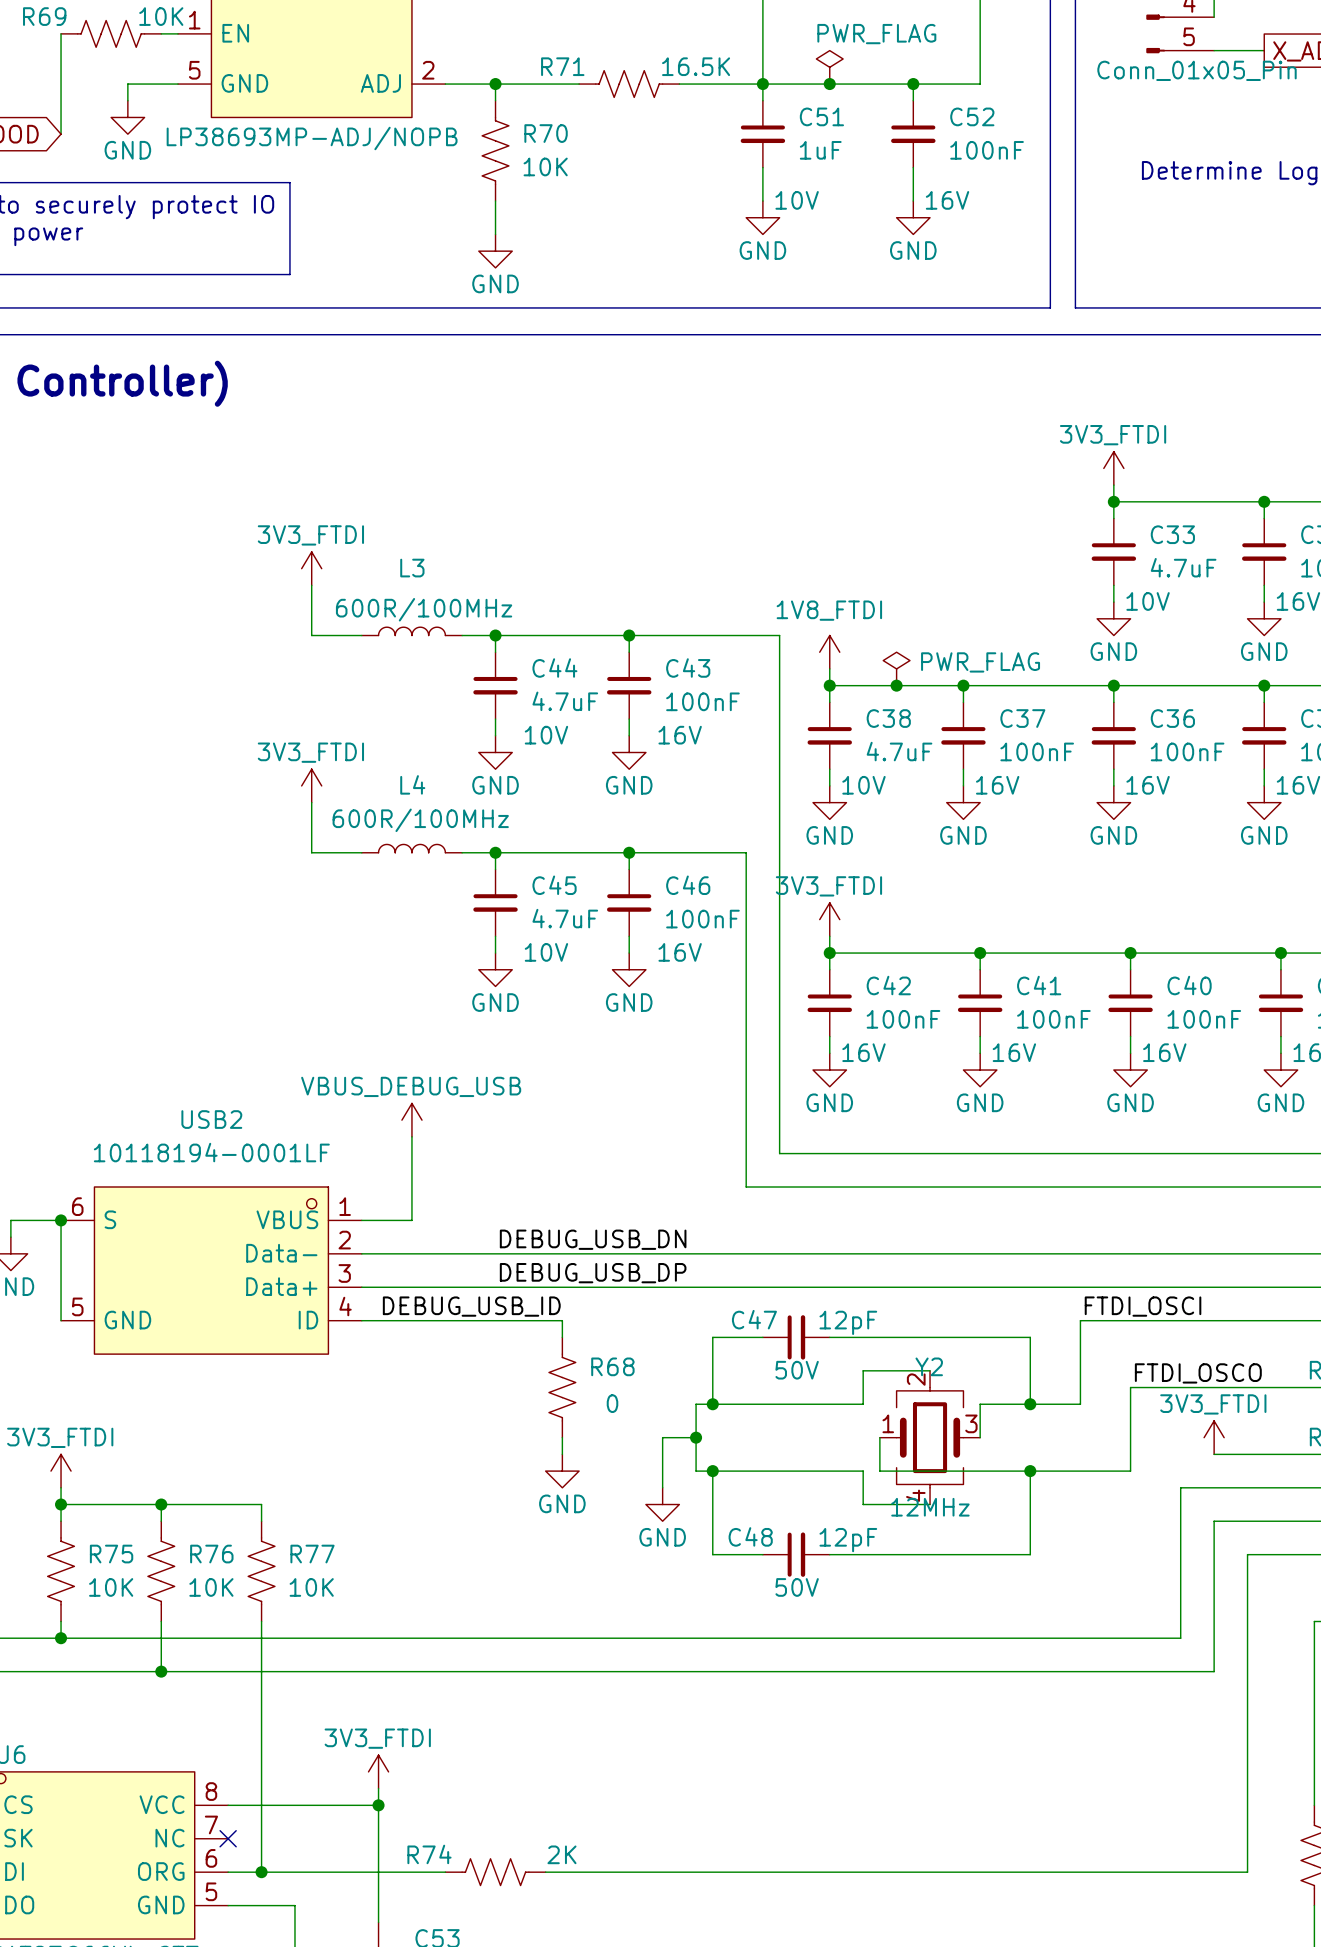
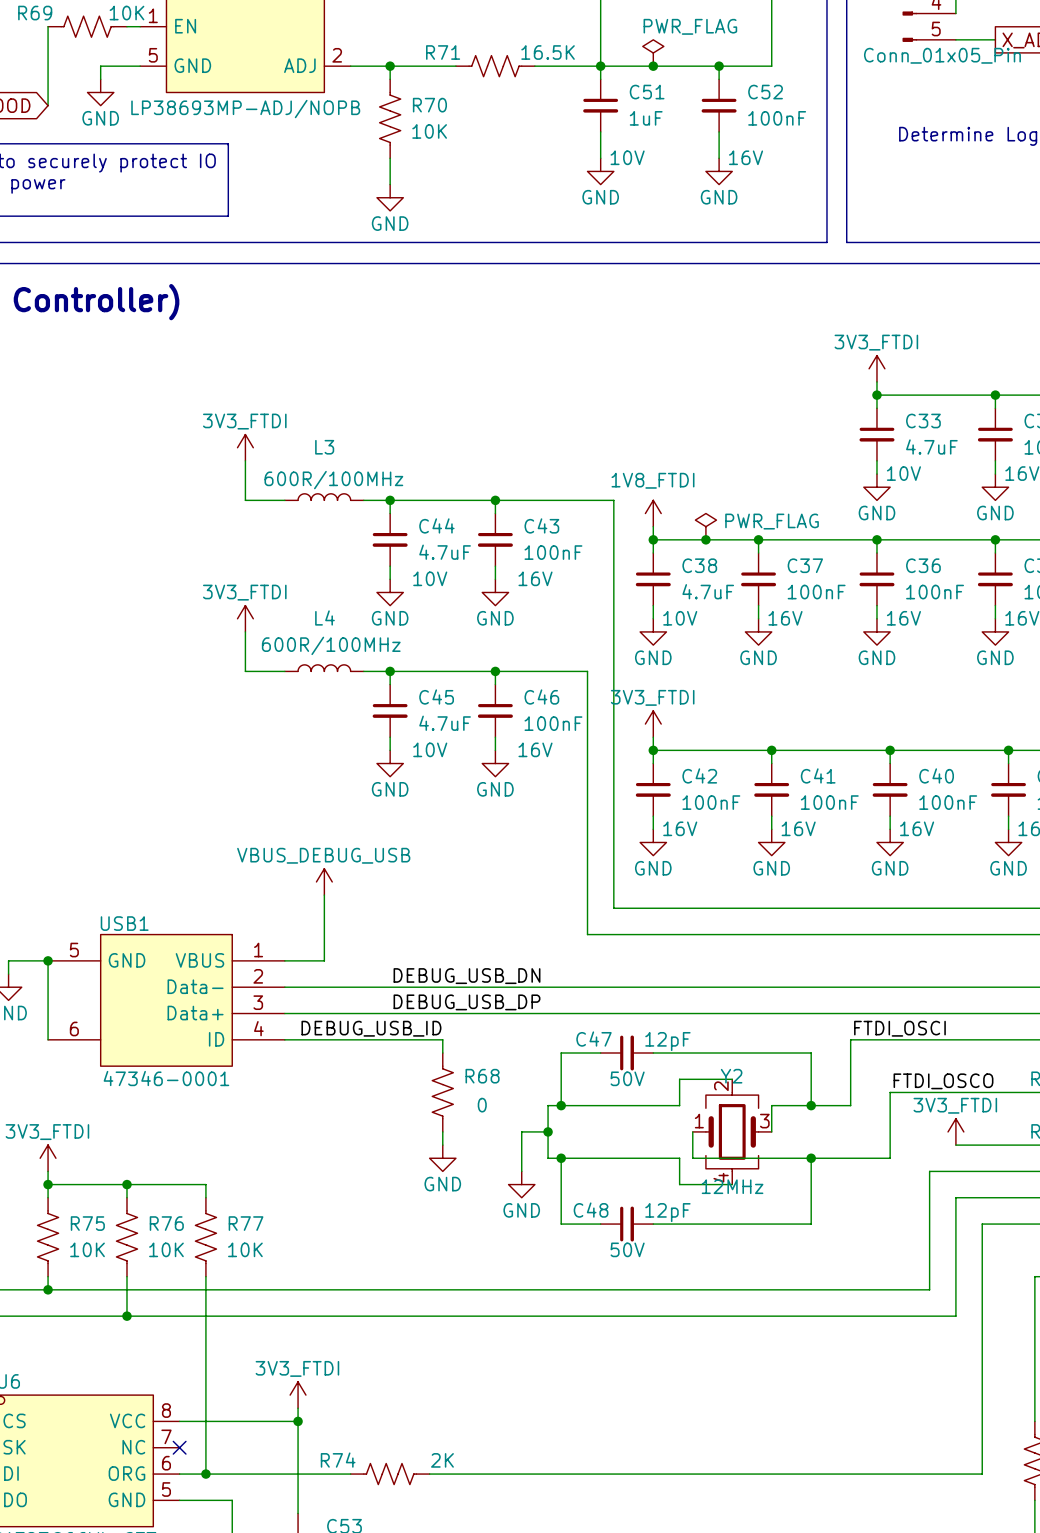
USB2: 10118194-0001LF (211, 1270) -> none
USB1: none -> 47346-0001 (166, 1000)

